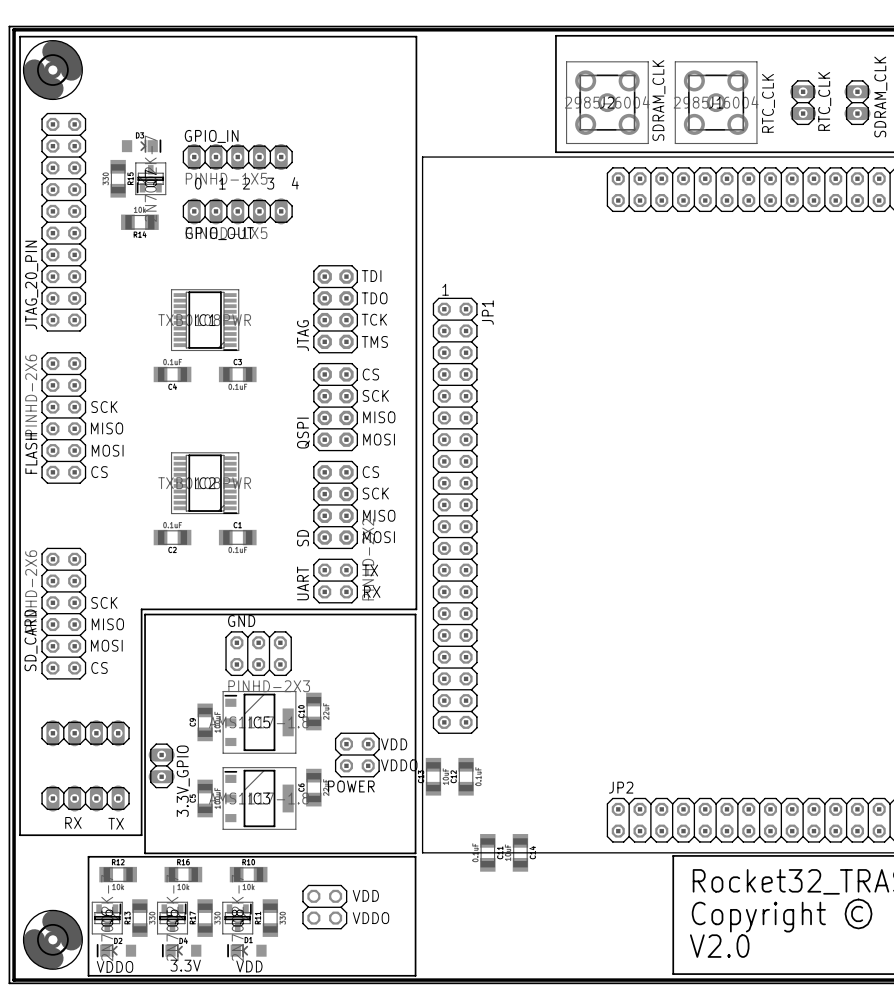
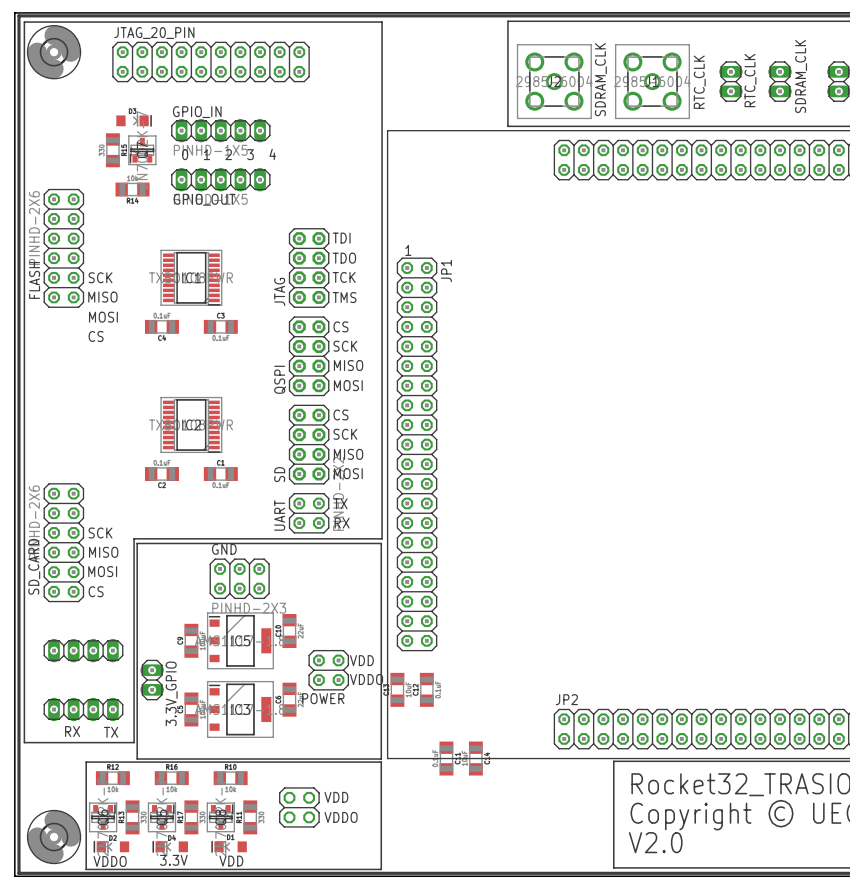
JTAG_20_PIN rotation: 0° (63, 222) -> 90° clockwise (211, 61)
JTAG_20_PIN position: (63, 222) -> (211, 61)
text position: SCK (104, 407) -> SCK (100, 277)
FLASH position: (63, 417) -> (63, 248)
text position: MISO (107, 428) -> MISO (102, 297)
text position: MOSI (107, 450) -> MOSI (103, 317)
text position: CS (99, 472) -> CS (96, 336)

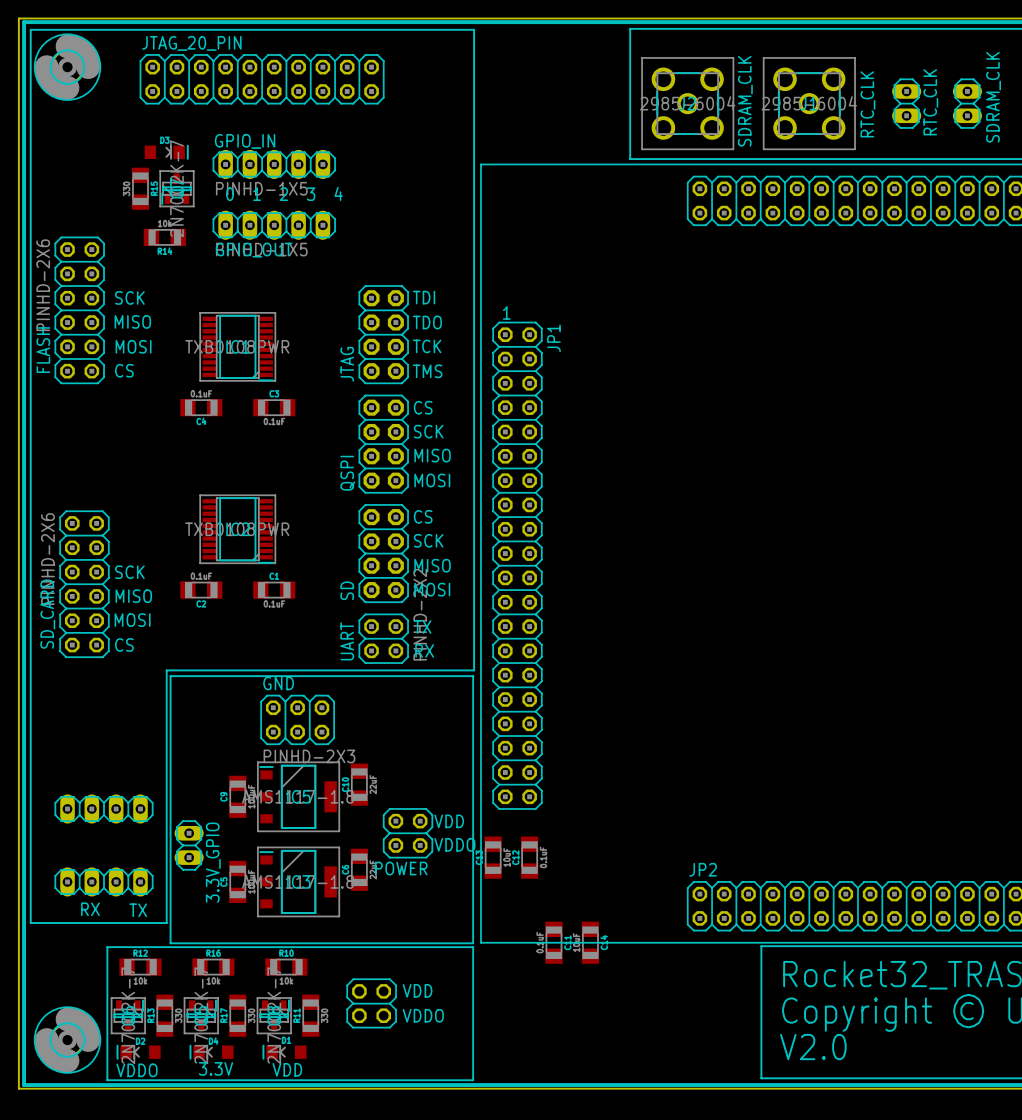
text: none -> SCK (129, 297)
text: none -> MISO (132, 321)
text: SCK (100, 277) -> MOSI (133, 346)
text: MISO (102, 297) -> CS (124, 370)
text: MOSI (103, 317) -> none
text: CS (96, 336) -> none
text position: SCK (100, 533) -> SCK (129, 572)
SD_CARD position: (63, 542) -> (84, 584)
text position: MISO (103, 552) -> MISO (133, 596)
text position: MOSI (102, 571) -> MOSI (132, 620)
text position: CS (96, 591) -> CS (124, 644)

